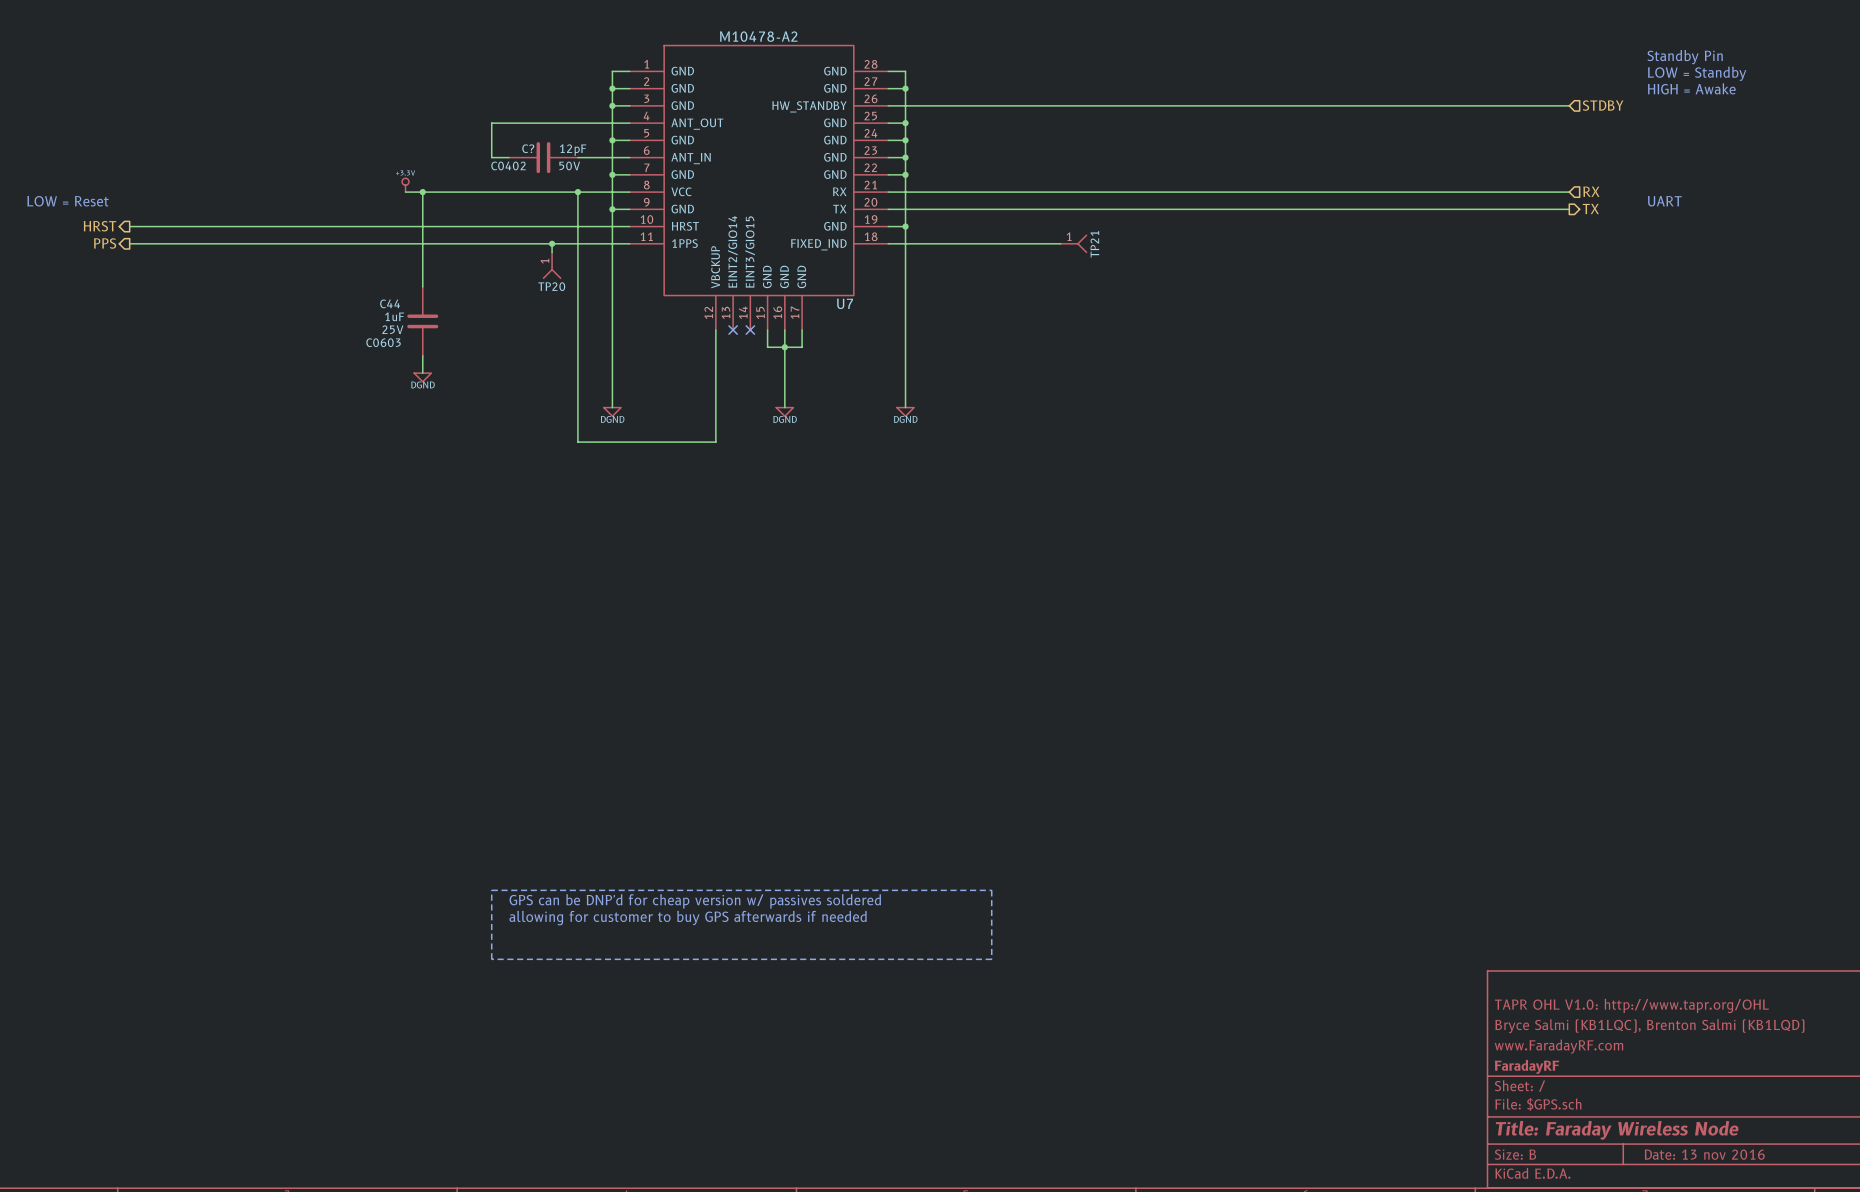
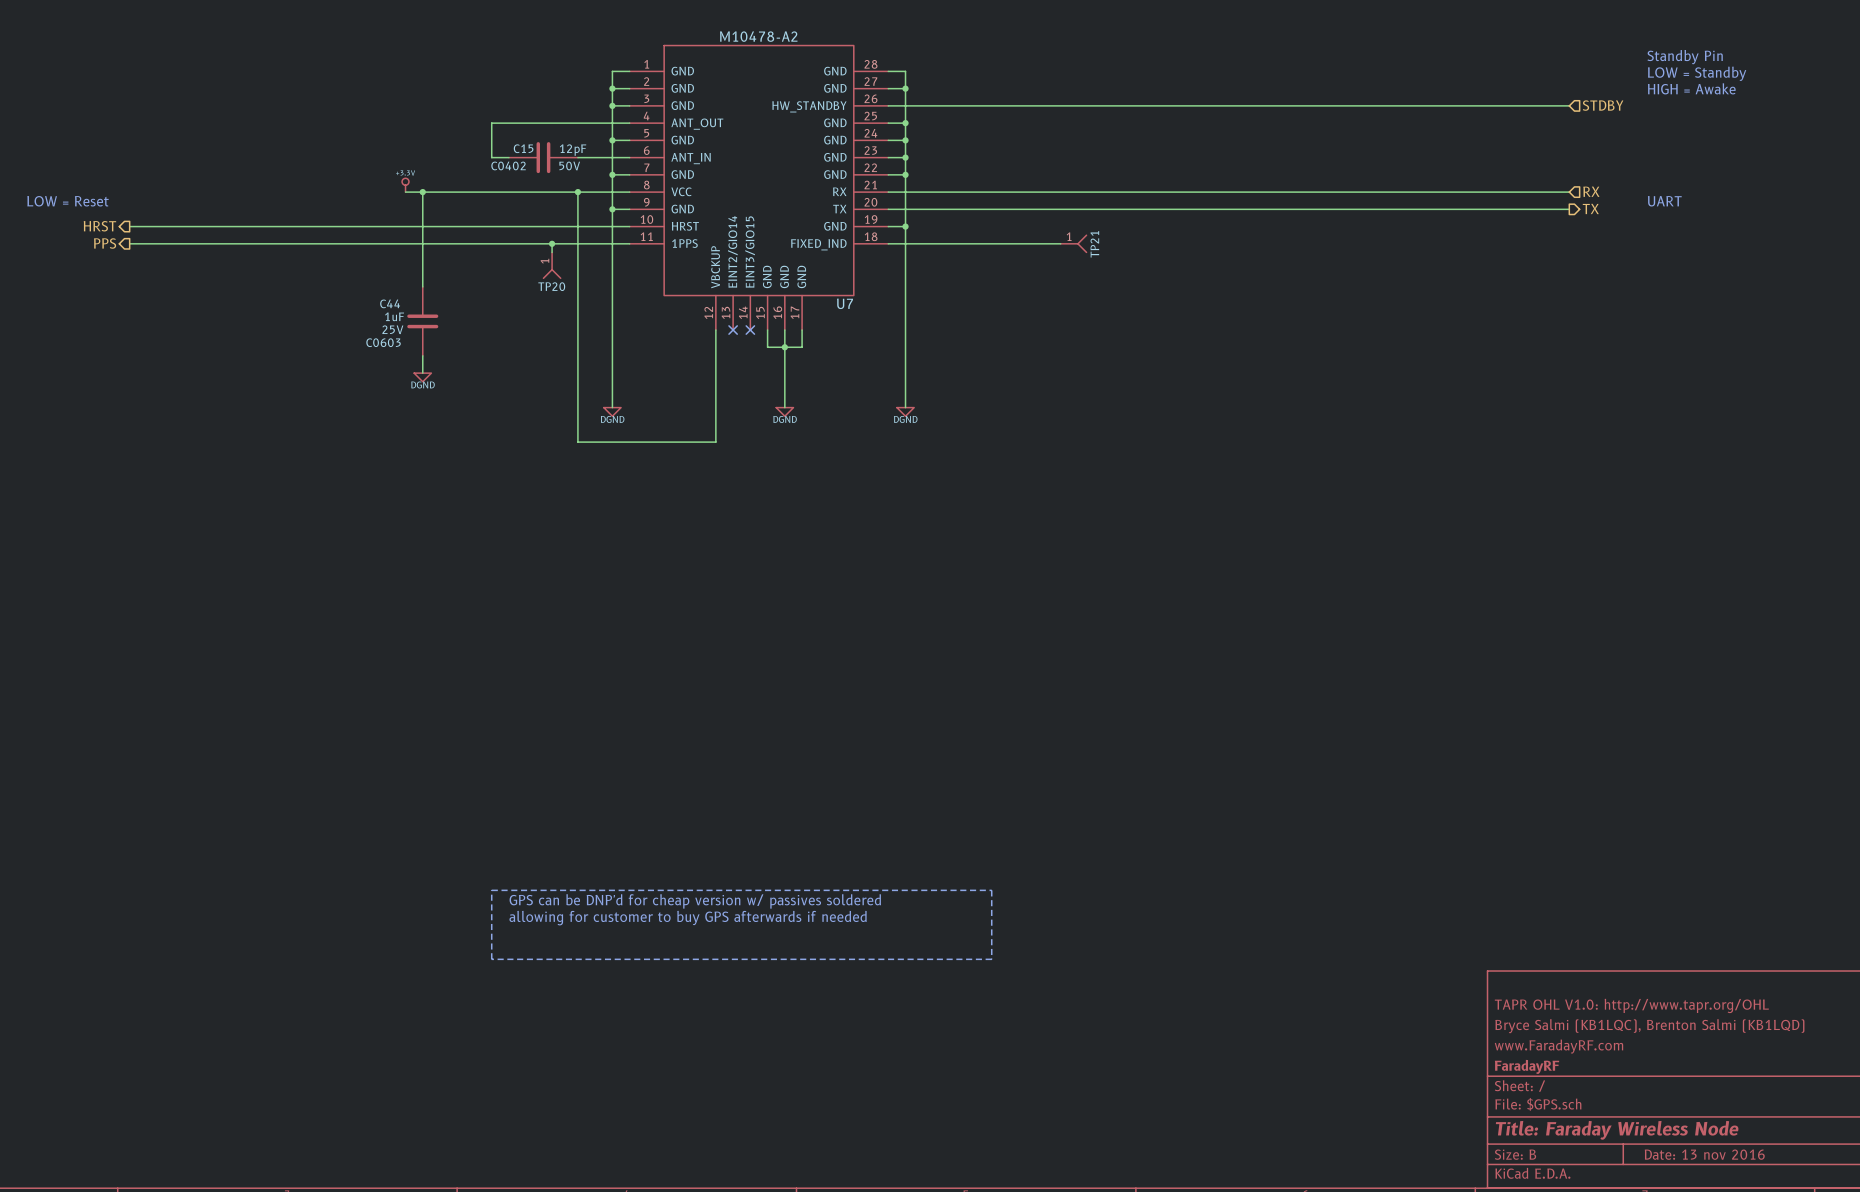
C? name: C? (528, 148) -> C15 (523, 148)

